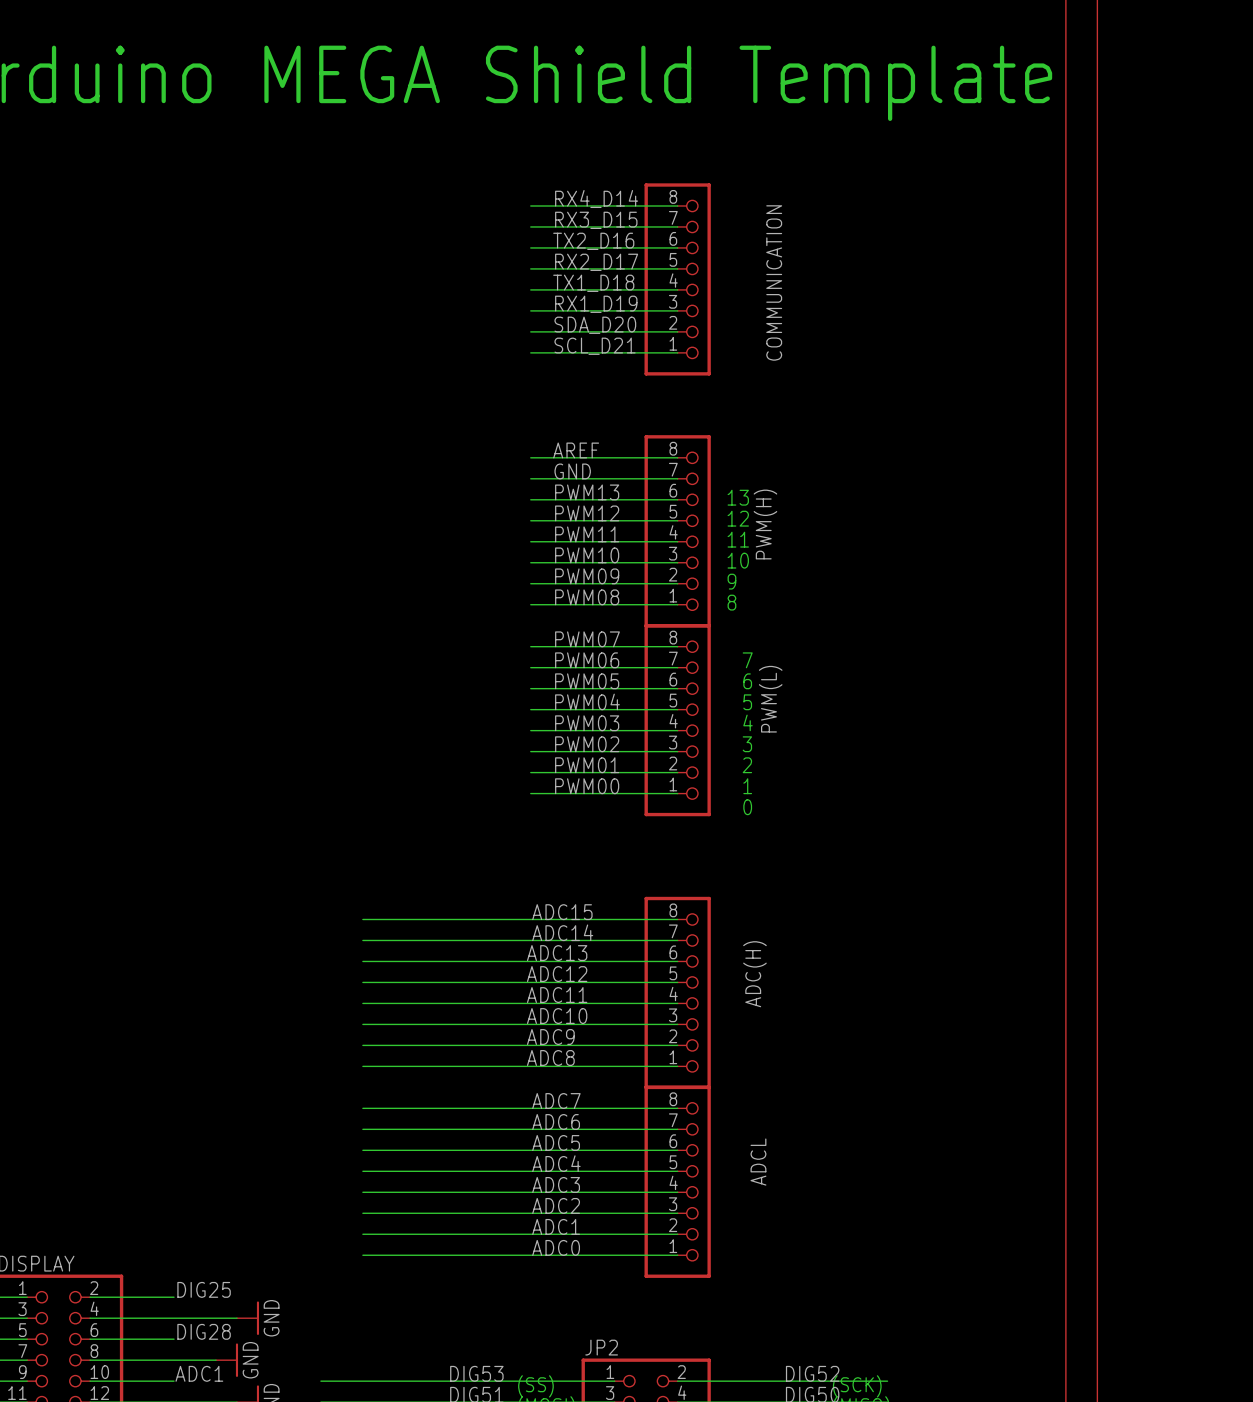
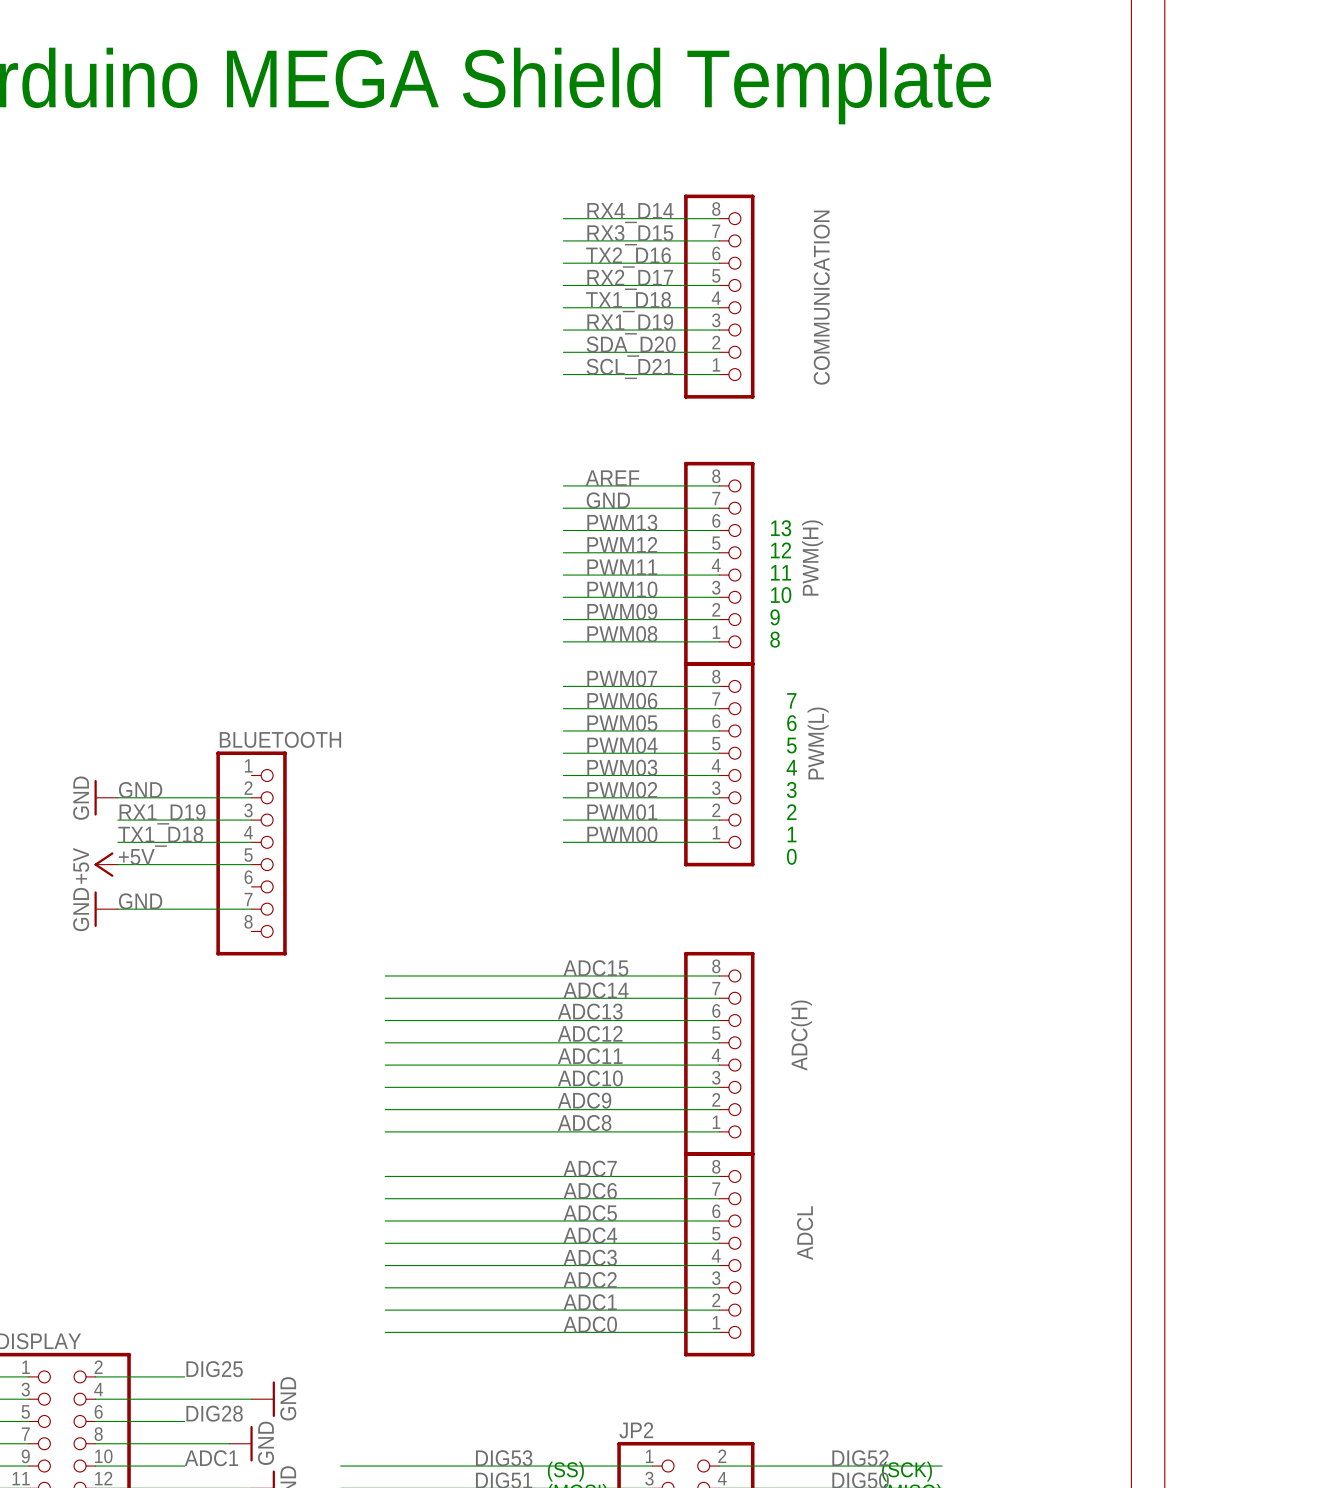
label: none -> GND (140, 789)
power symbol: none -> GND (106, 797)
wire: none -> (117, 797) (251, 797)
label: none -> RX1_D19 (162, 814)
wire: none -> (117, 820) (251, 820)
label: none -> TX1_D18 (160, 836)
wire: none -> (117, 842) (251, 842)
BLUETOOTH: none -> (251, 853)
label: none -> +5V (136, 856)
power symbol: none -> +5V (106, 864)
wire: none -> (117, 864) (251, 864)
label: none -> GND (140, 901)
power symbol: none -> GND (106, 909)
wire: none -> (117, 909) (251, 909)

